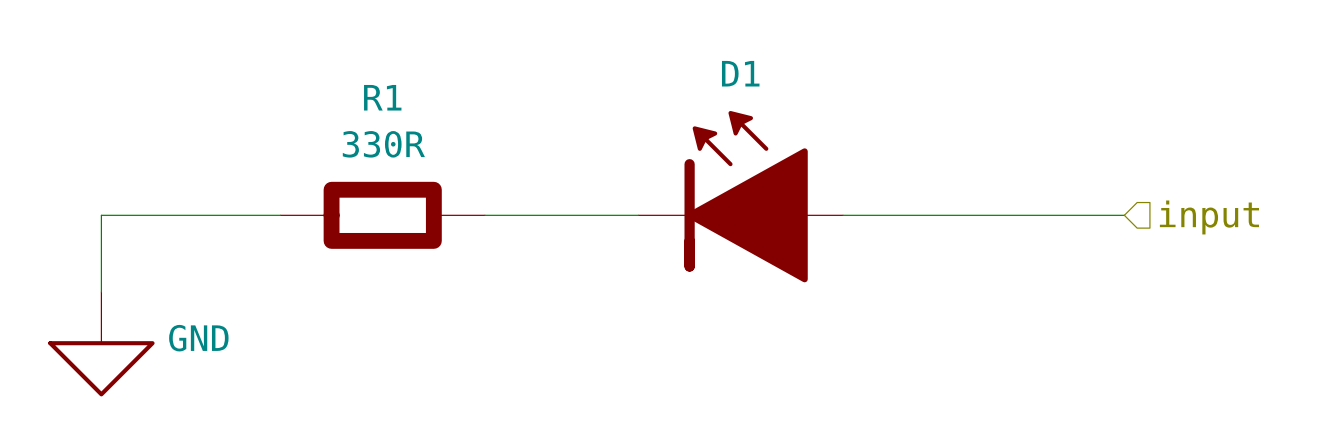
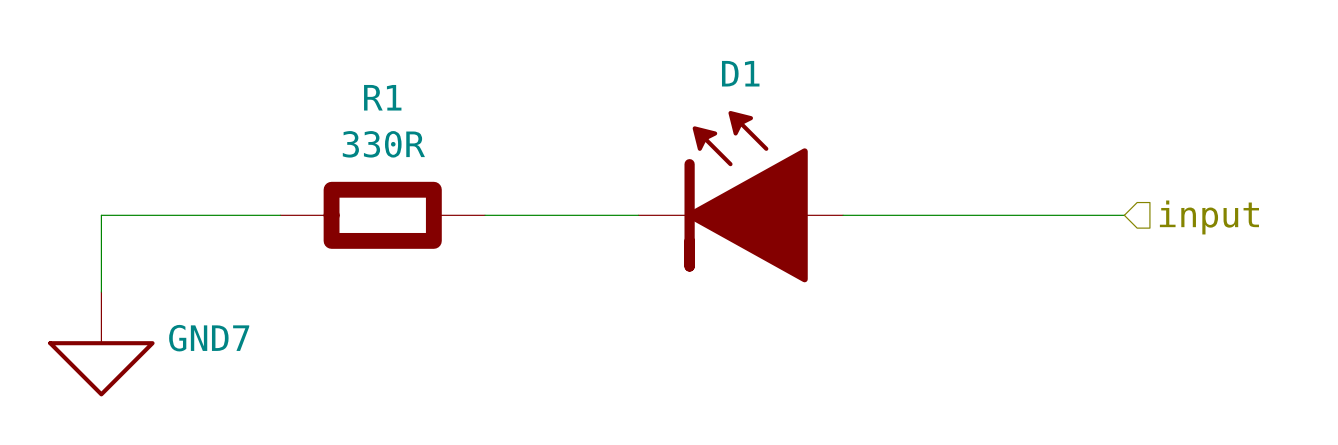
GND name: GND (198, 338) -> GND7 (209, 338)

